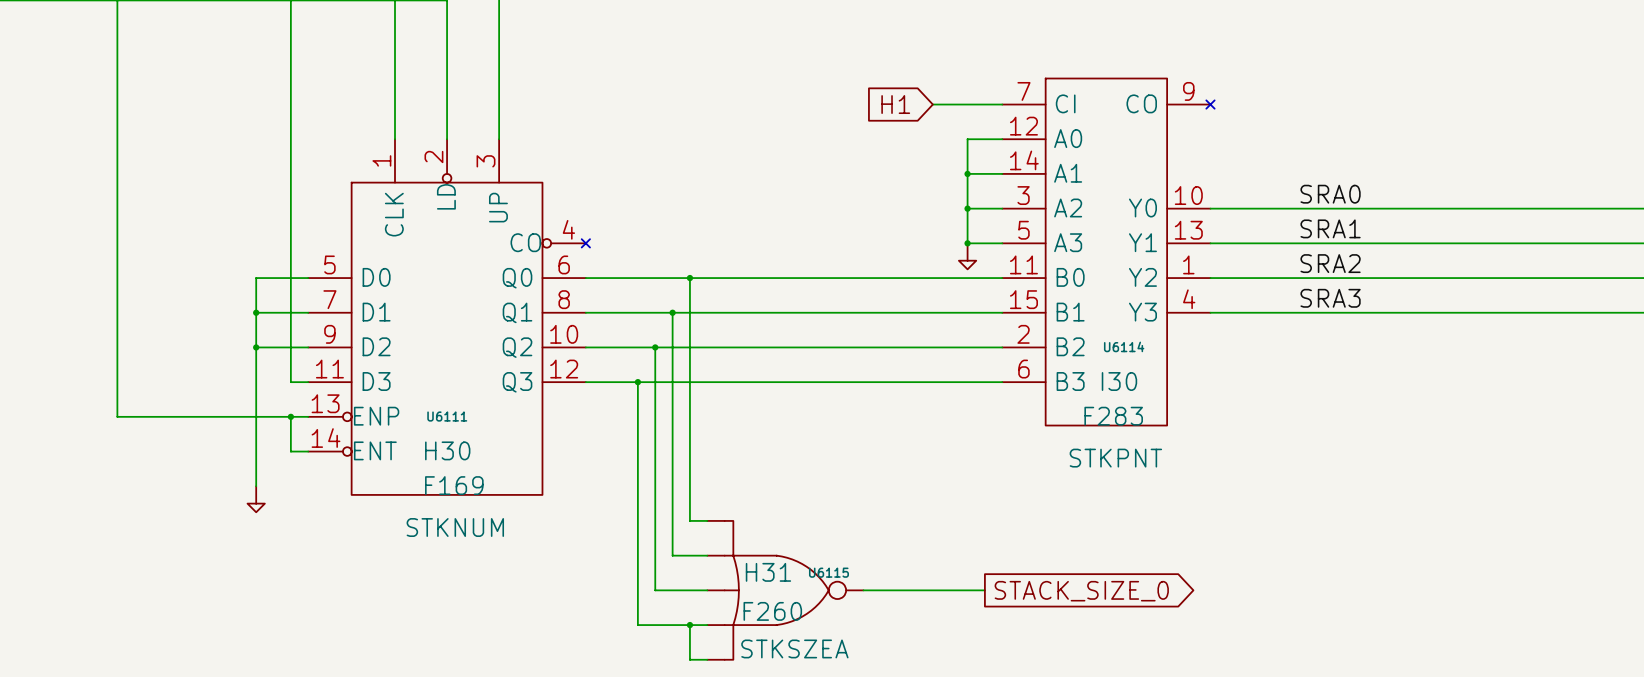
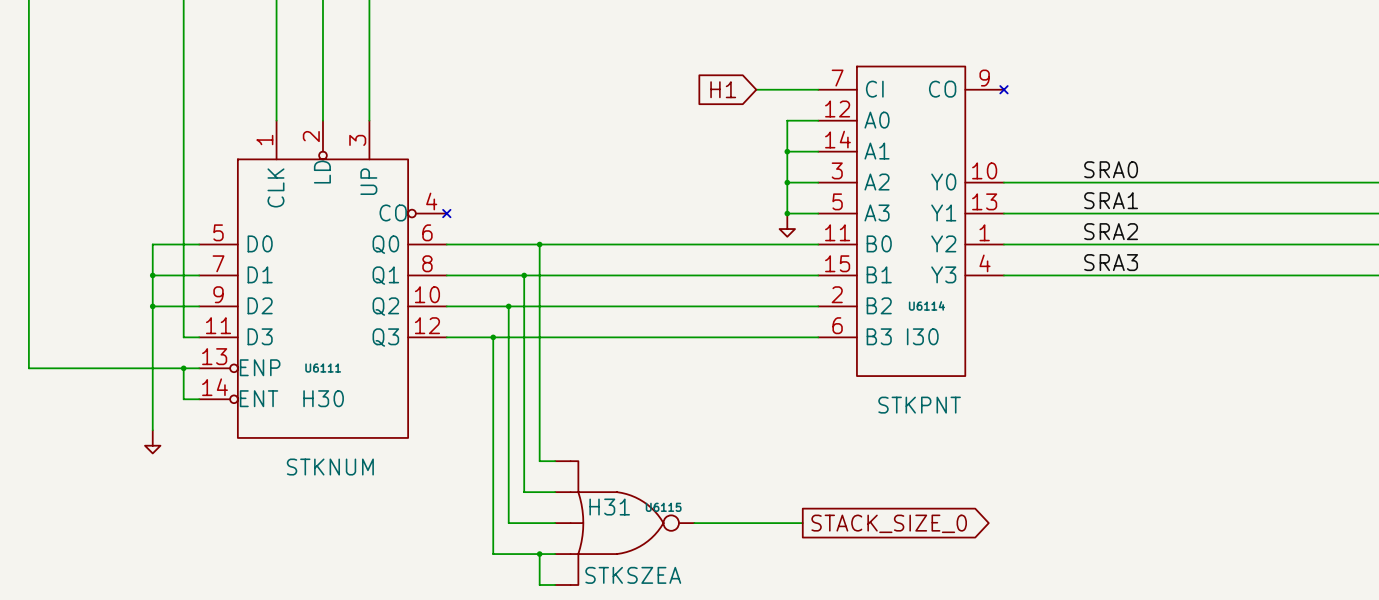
U6114 value: F283 (1113, 416) -> none
U6111 value: F169 (454, 485) -> none
U6115 value: F260 (772, 611) -> none

